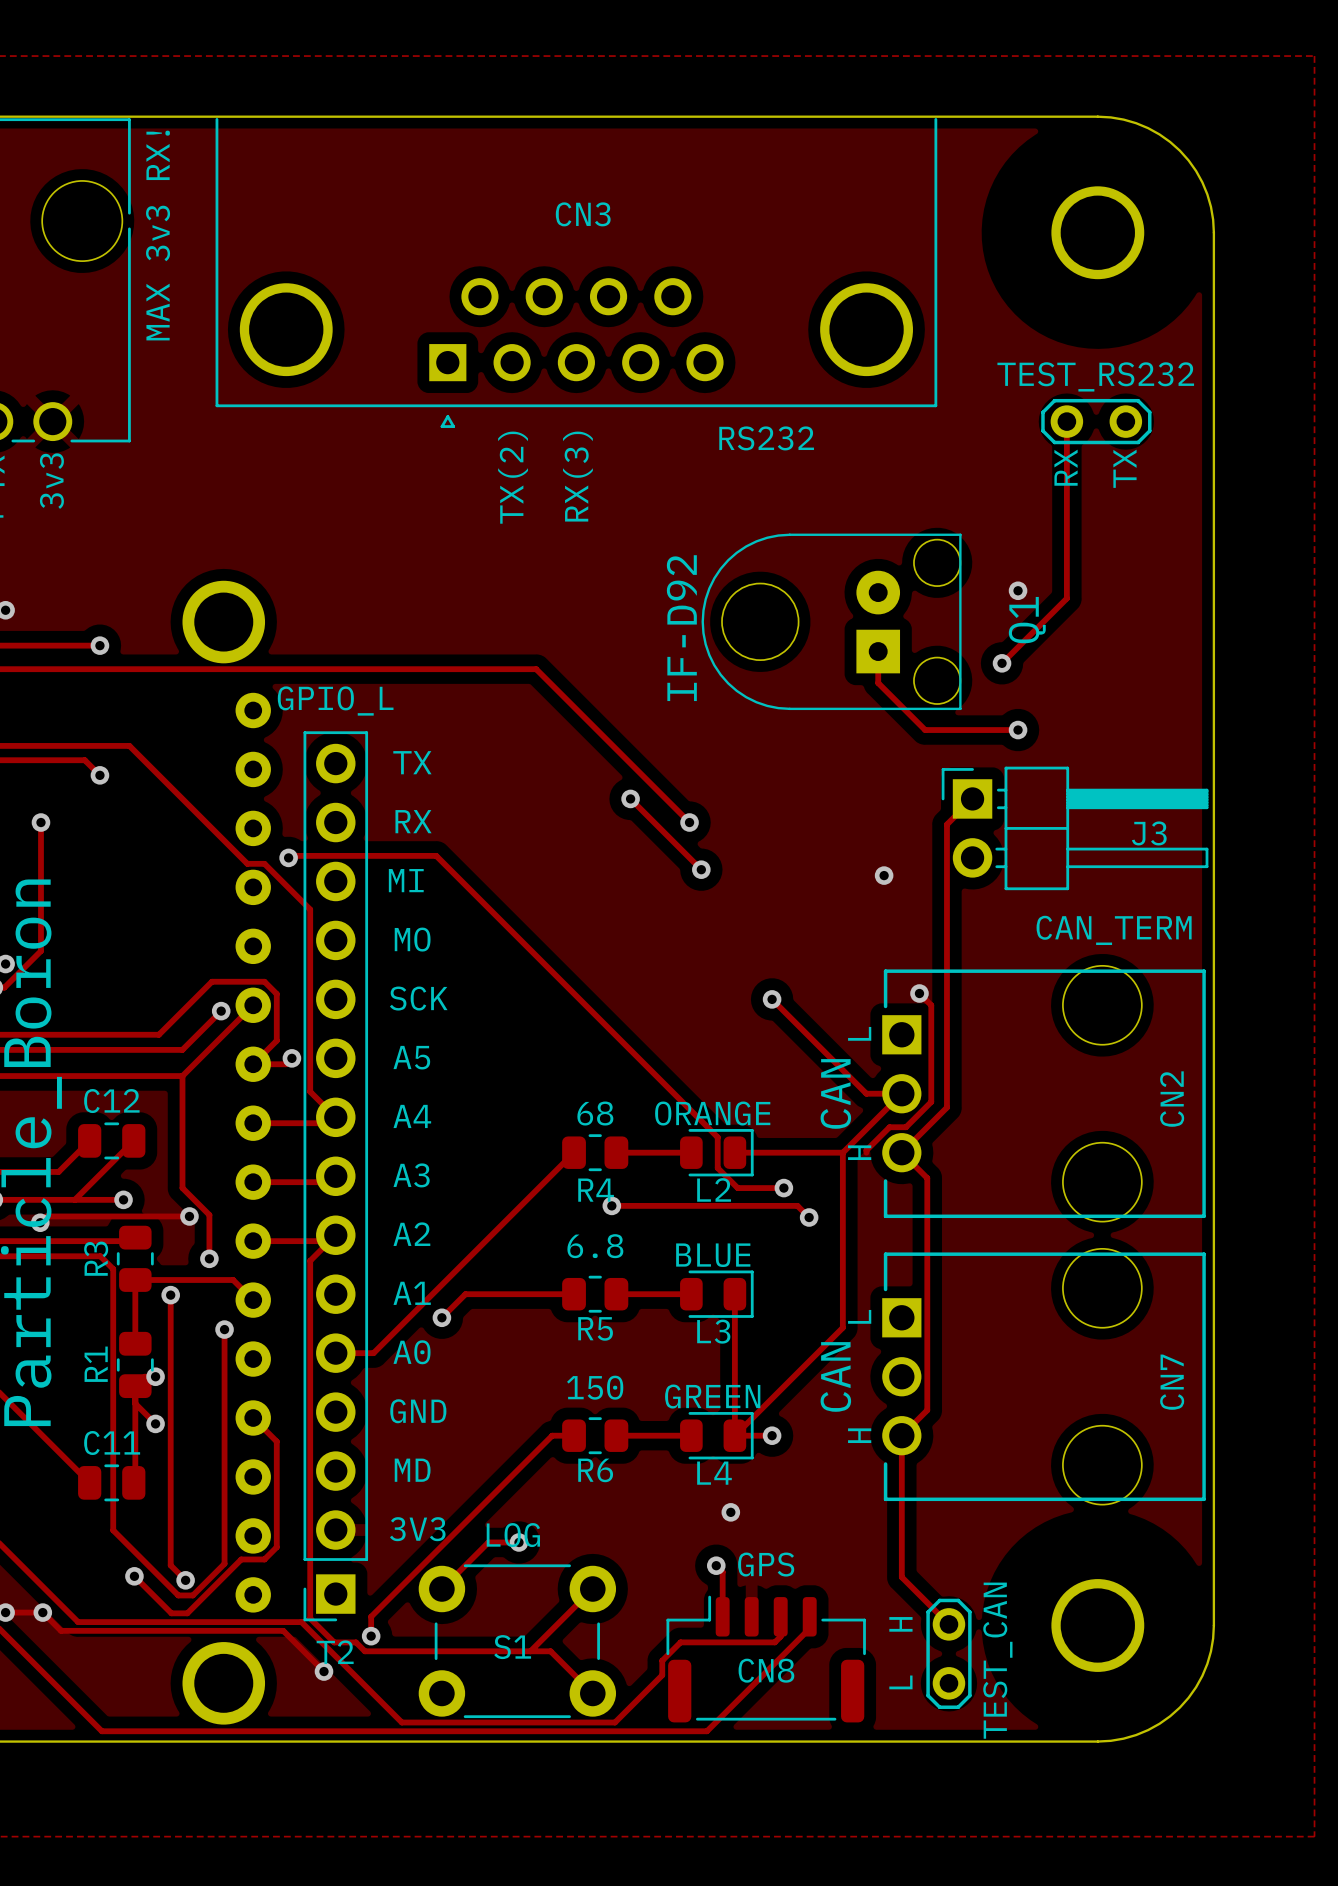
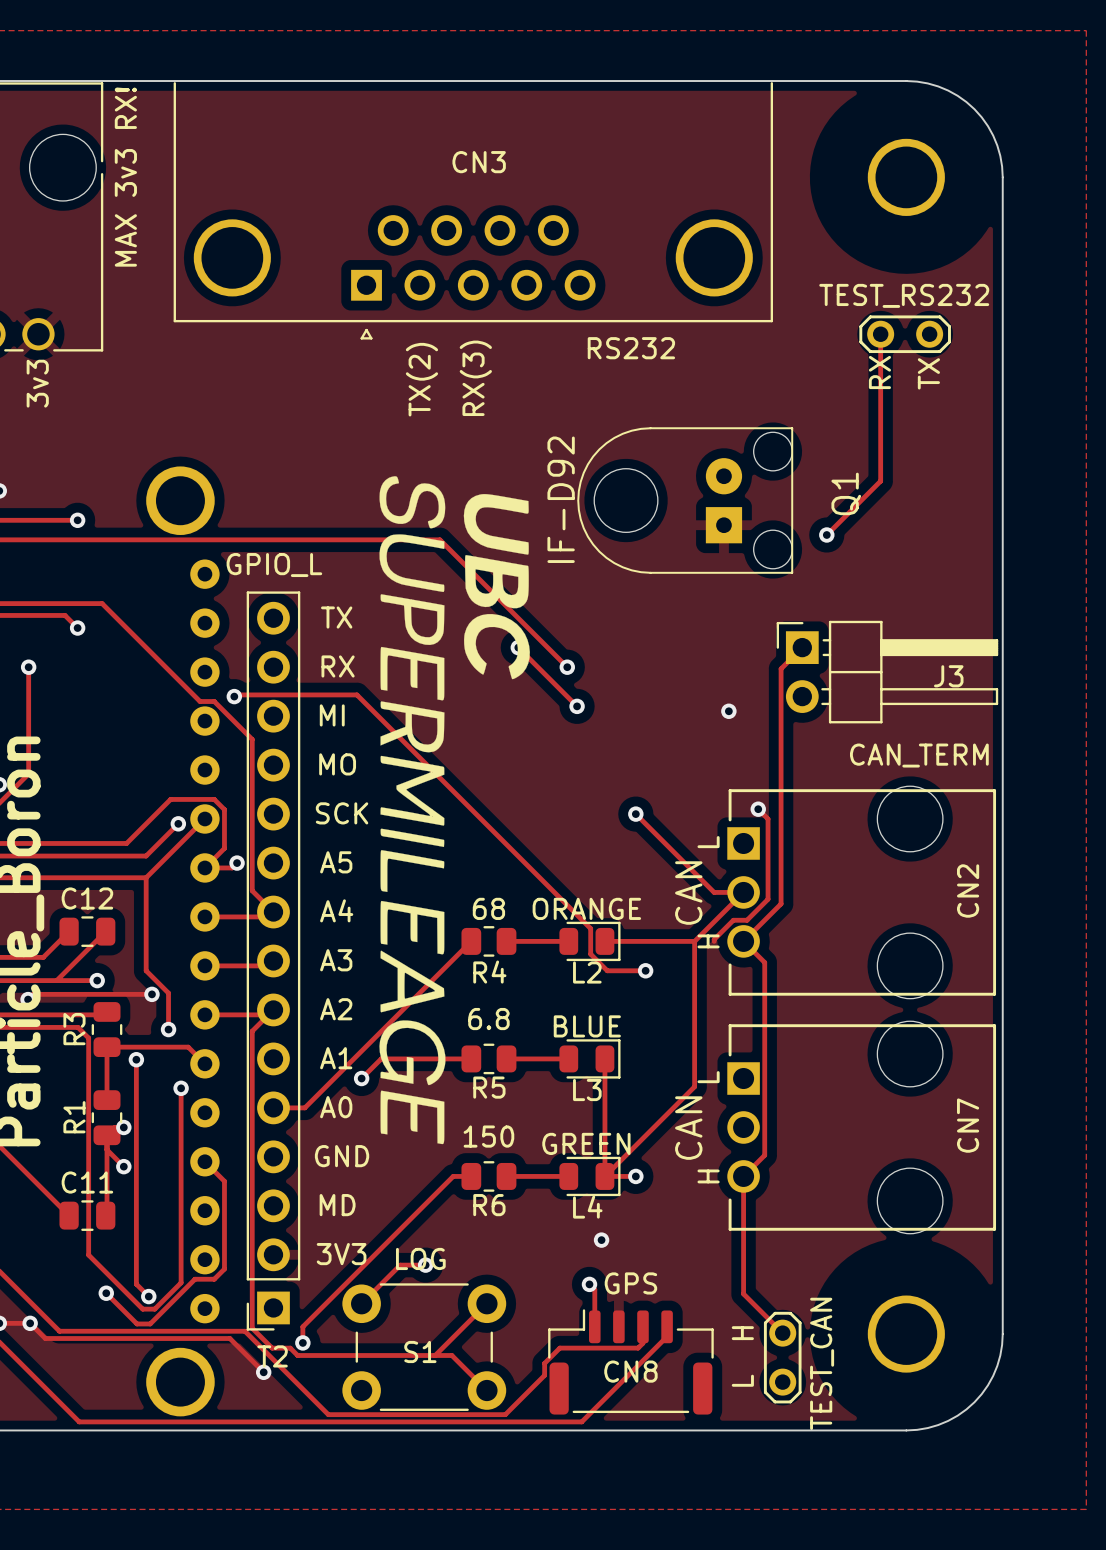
via: (1018, 590) -> none
drawing: none -> [379, 476, 530, 1145]
track: (878, 651) (878, 683) (925, 730) (1018, 730) -> none
via: (1018, 730) -> none
track: (611, 1205) (797, 1205) (809, 1217) -> none
via: (611, 1205) -> none
via: (809, 1217) -> none

